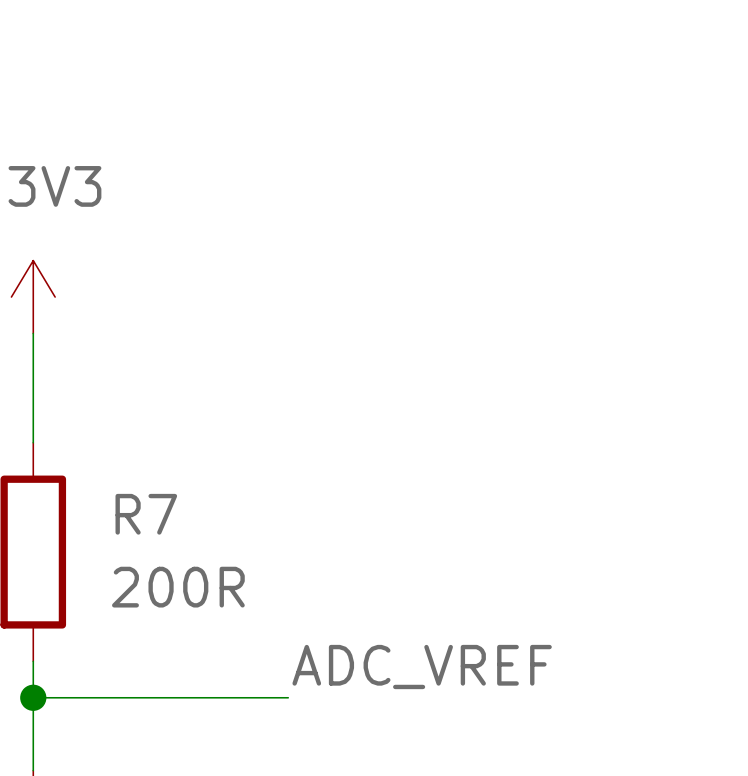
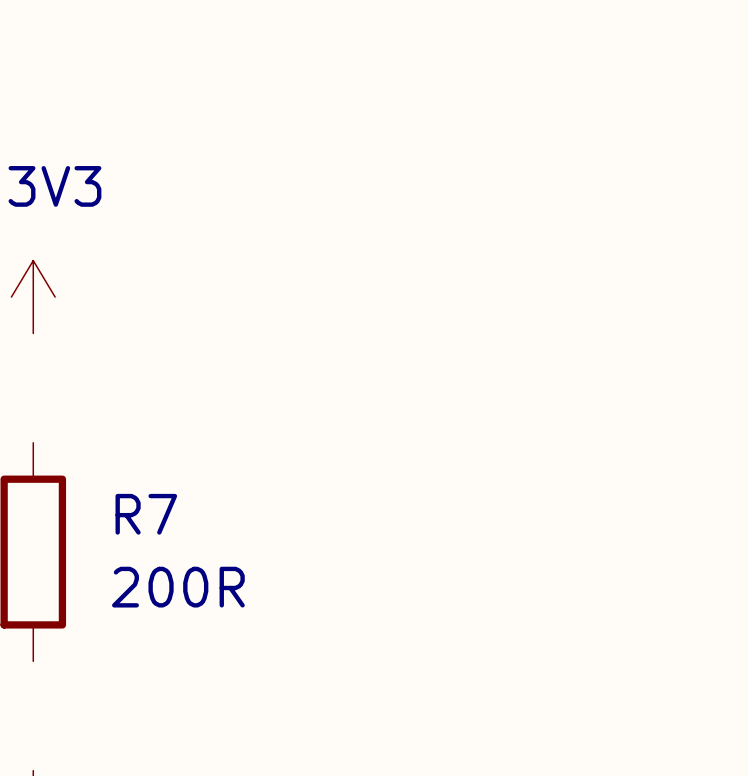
wire: (33, 333) (33, 442) -> none
wire: (33, 661) (33, 770) -> none
label: ADC_VREF (422, 667) -> none
wire: (33, 697) (288, 697) -> none
junction: (33, 697) -> none

